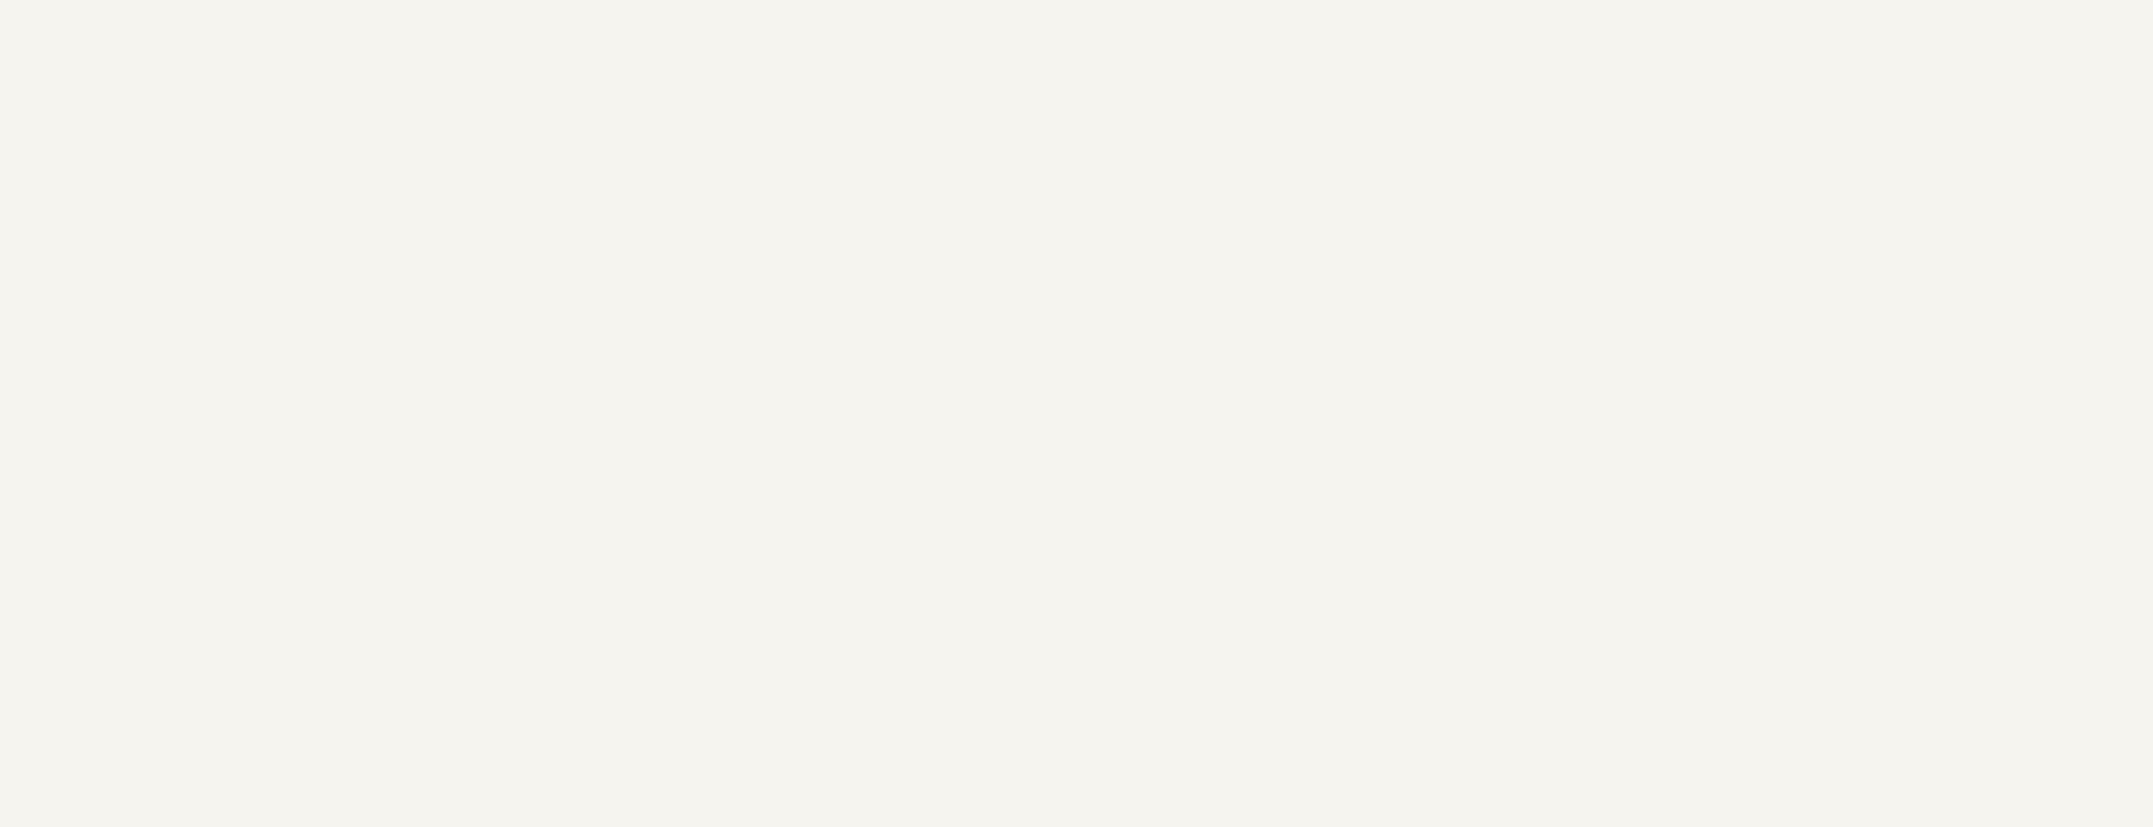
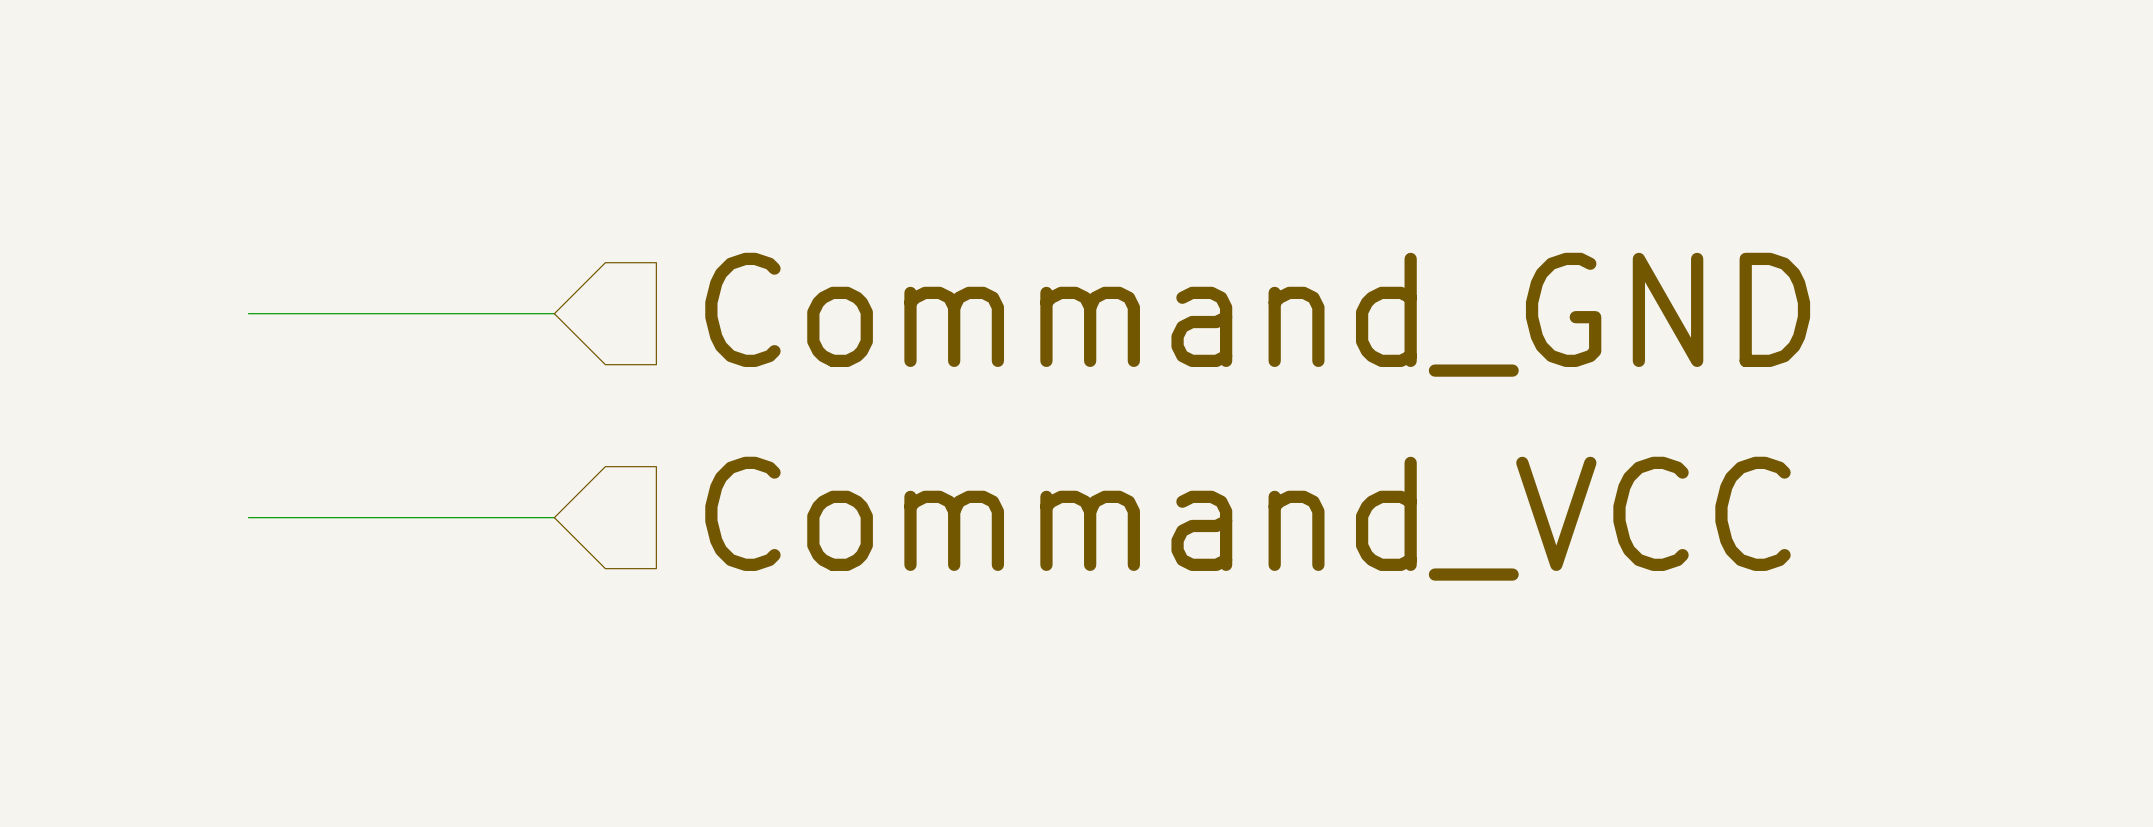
wire: none -> (248, 313) (554, 313)
hierarchical label: none -> Command_GND (1257, 314)
wire: none -> (248, 517) (554, 517)
hierarchical label: none -> Command_VCC (1247, 518)

